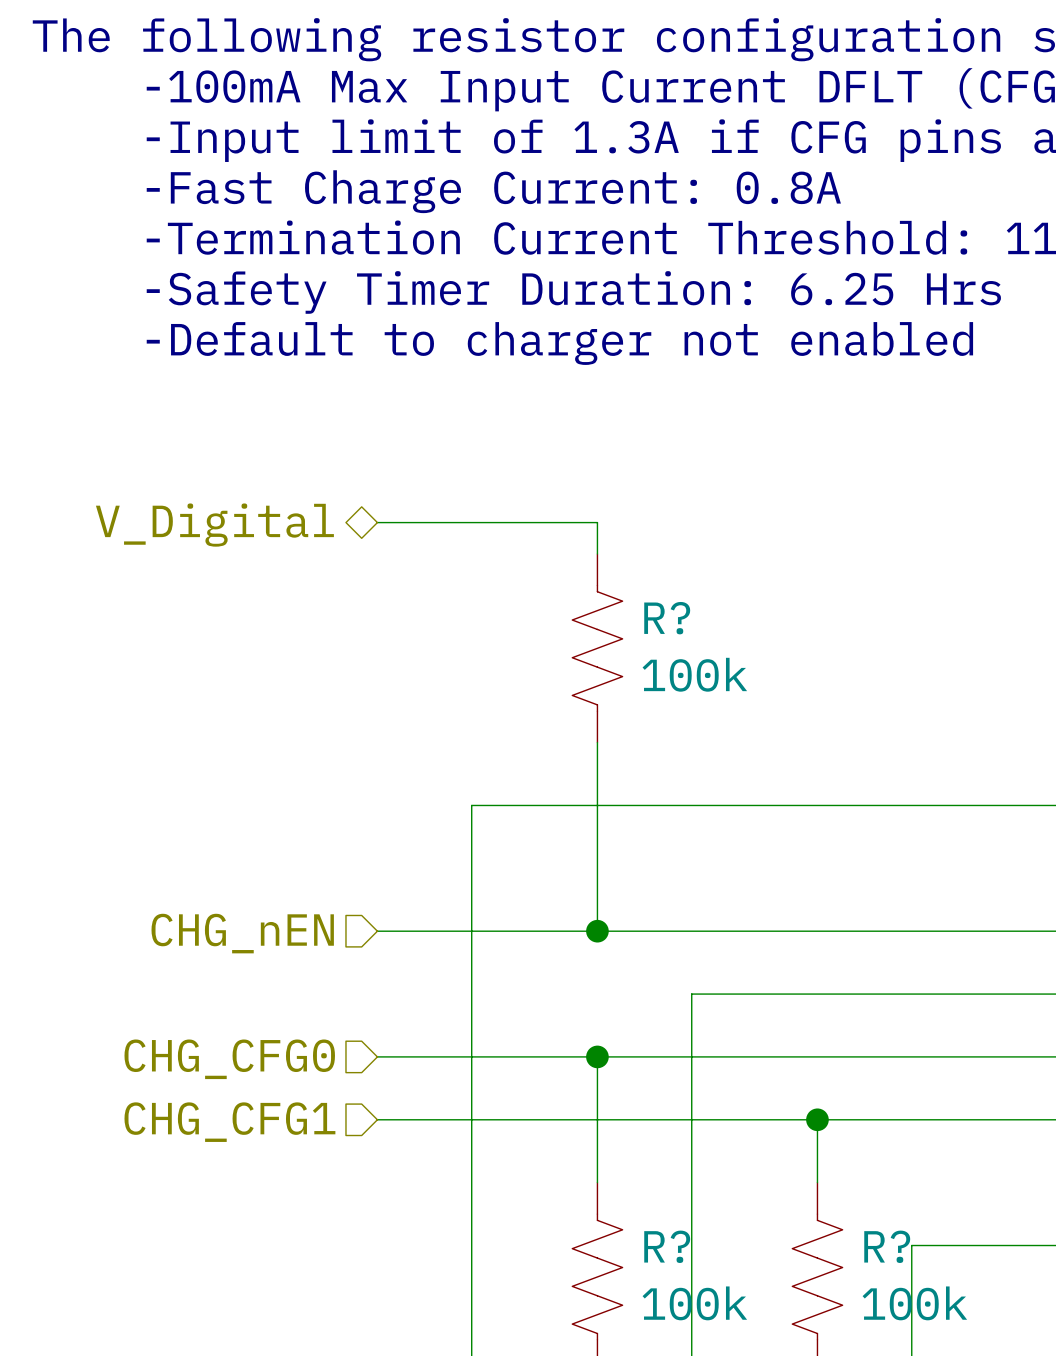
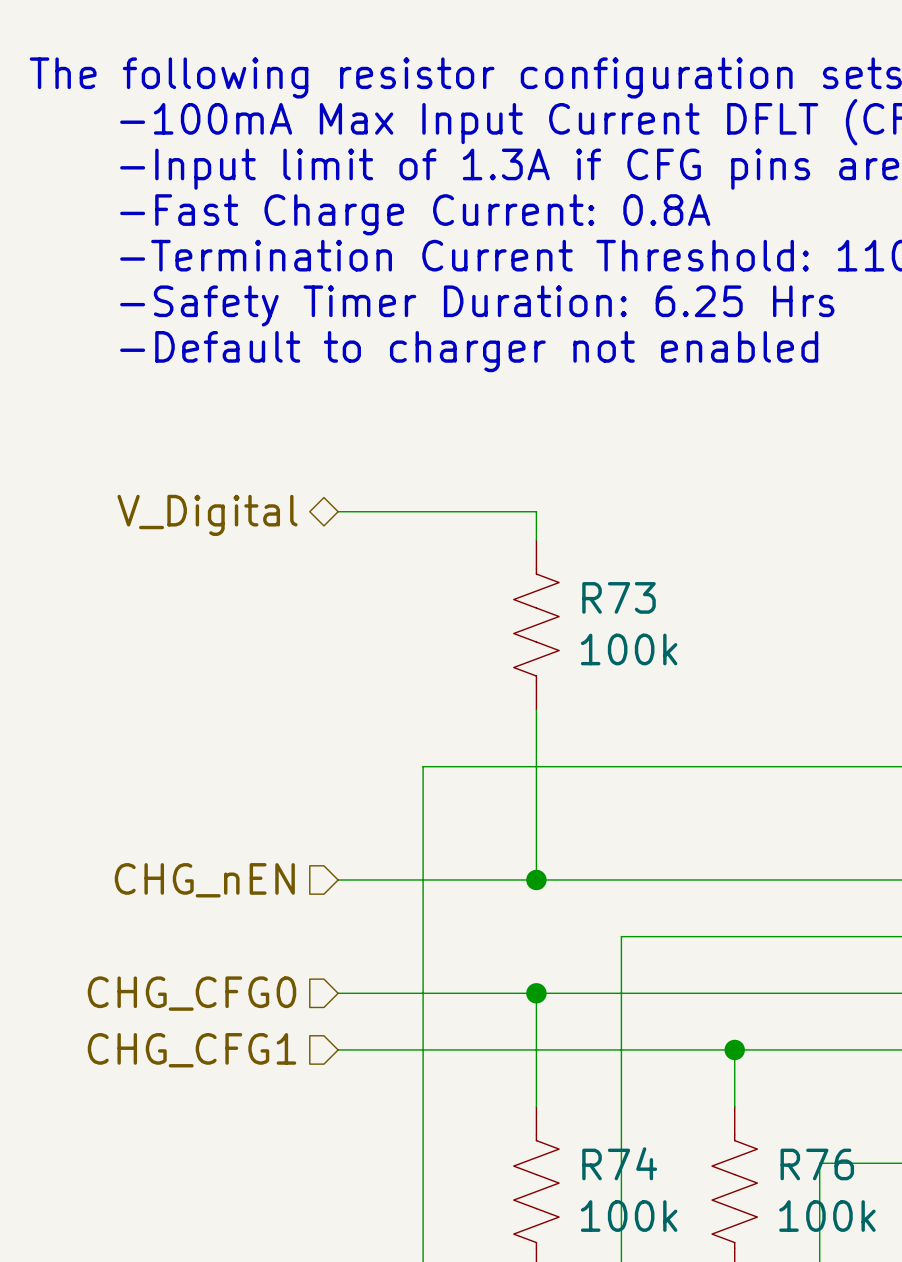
R? name: R? (667, 618) -> R73 (619, 597)
R? name: R? (667, 1246) -> R74 (619, 1163)
R? name: R? (887, 1246) -> R76 (817, 1164)

